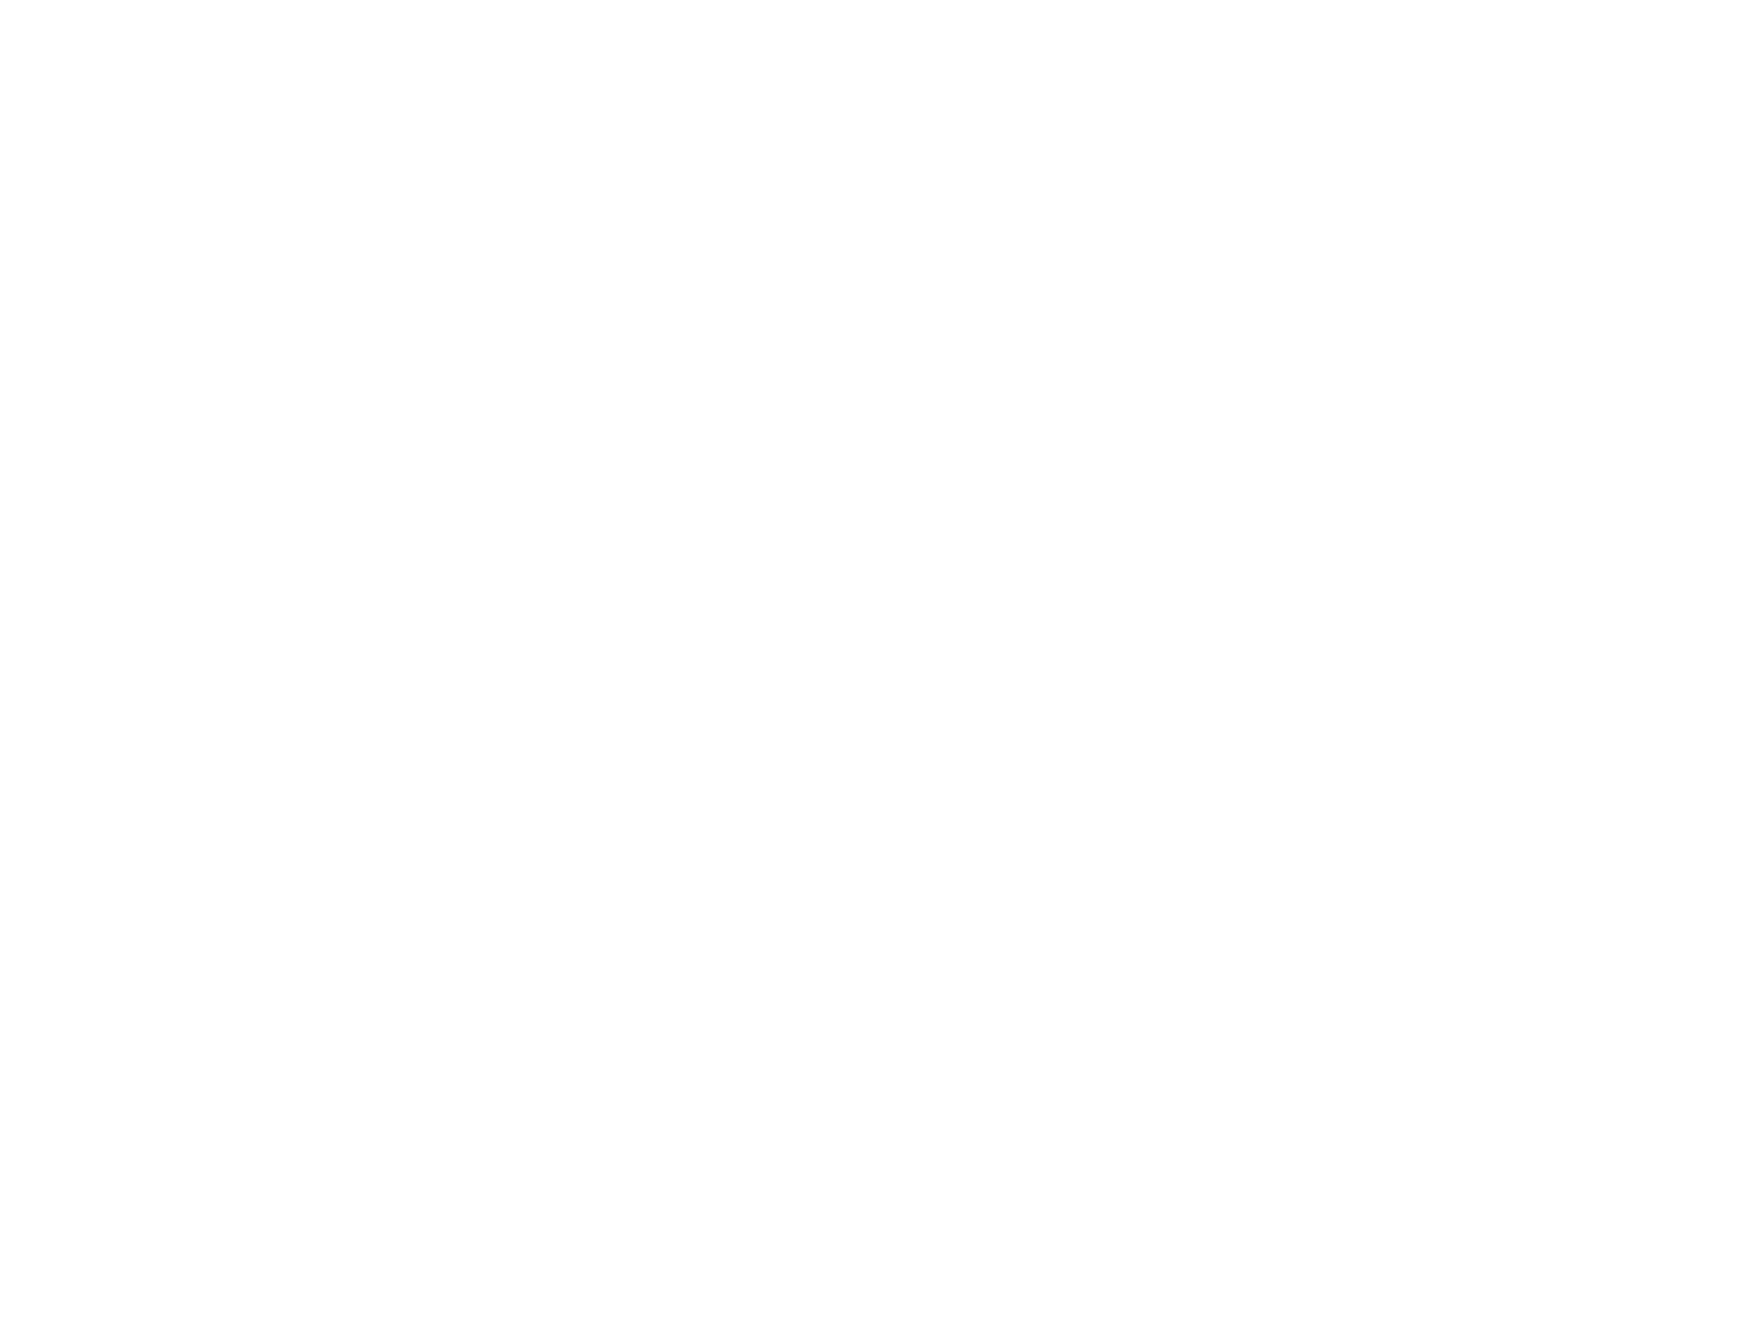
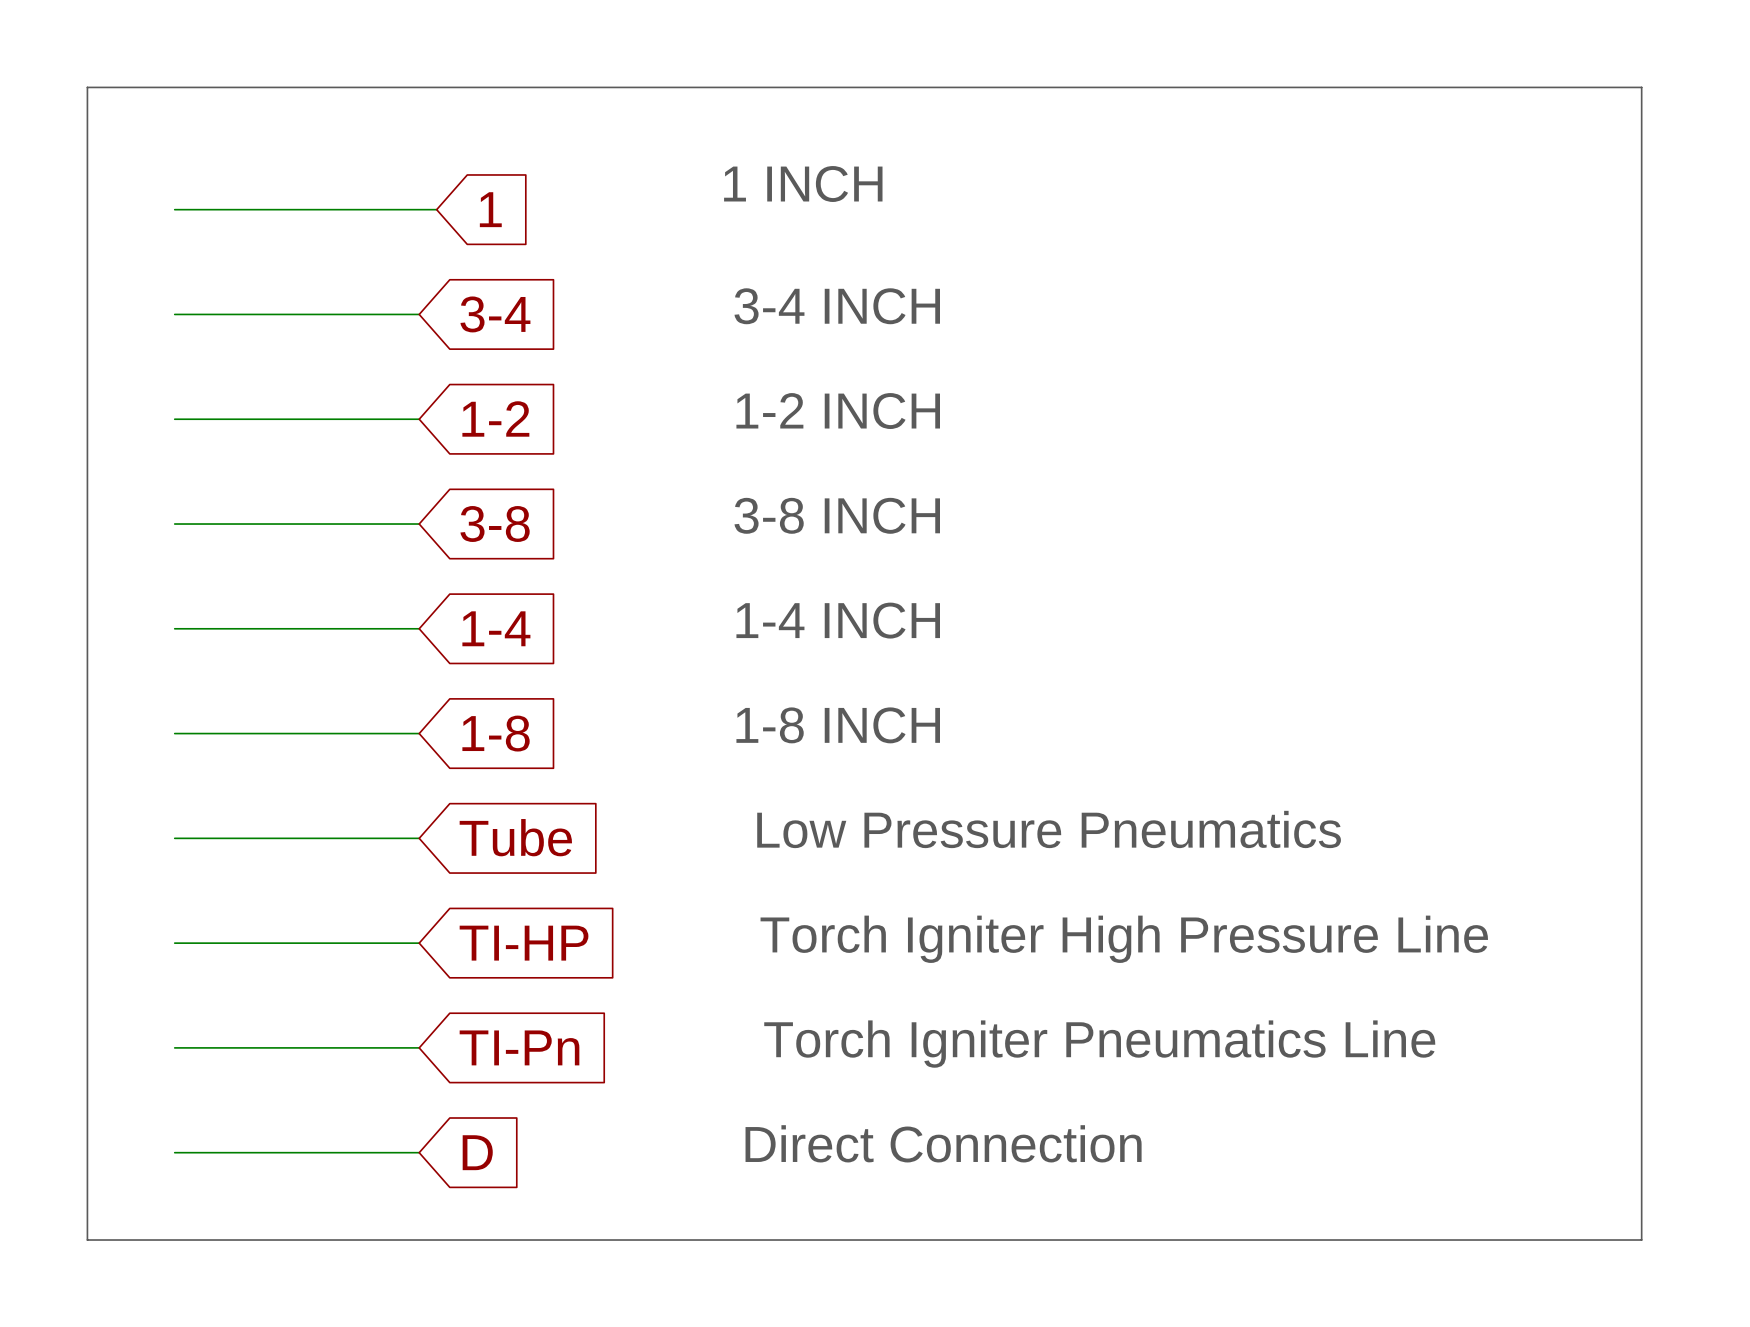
line: none -> (87, 87) (1641, 87) (1641, 1240) (87, 1240) (87, 87)
text: none -> 1 INCH (803, 184)
wire: none -> (174, 209) (436, 209)
global label: none -> 1 (490, 209)
text: none -> 3-4 INCH (837, 306)
global label: none -> 3-4 (495, 314)
wire: none -> (174, 314) (419, 314)
text: none -> 1-2 INCH (838, 411)
wire: none -> (174, 419) (419, 419)
global label: none -> 1-2 (495, 418)
text: none -> 3-8 INCH (837, 515)
wire: none -> (174, 524) (419, 524)
global label: none -> 3-8 (495, 524)
text: none -> 1-4 INCH (838, 620)
global label: none -> 1-4 (496, 628)
wire: none -> (174, 628) (419, 628)
text: none -> 1-8 INCH (838, 725)
wire: none -> (174, 733) (419, 733)
global label: none -> 1-8 (496, 733)
text: none -> Low Pressure Pneumatics (1049, 829)
wire: none -> (174, 838) (419, 838)
global label: none -> Tube (515, 837)
text: none -> Torch Igniter High Pressure Line (1124, 939)
wire: none -> (174, 943) (419, 943)
global label: none -> TI-HP (524, 943)
text: none -> Torch Igniter Pneumatics Line (1099, 1044)
wire: none -> (174, 1047) (419, 1047)
global label: none -> TI-Pn (519, 1047)
text: none -> Direct Connection (943, 1143)
wire: none -> (174, 1152) (419, 1152)
global label: none -> D (477, 1152)

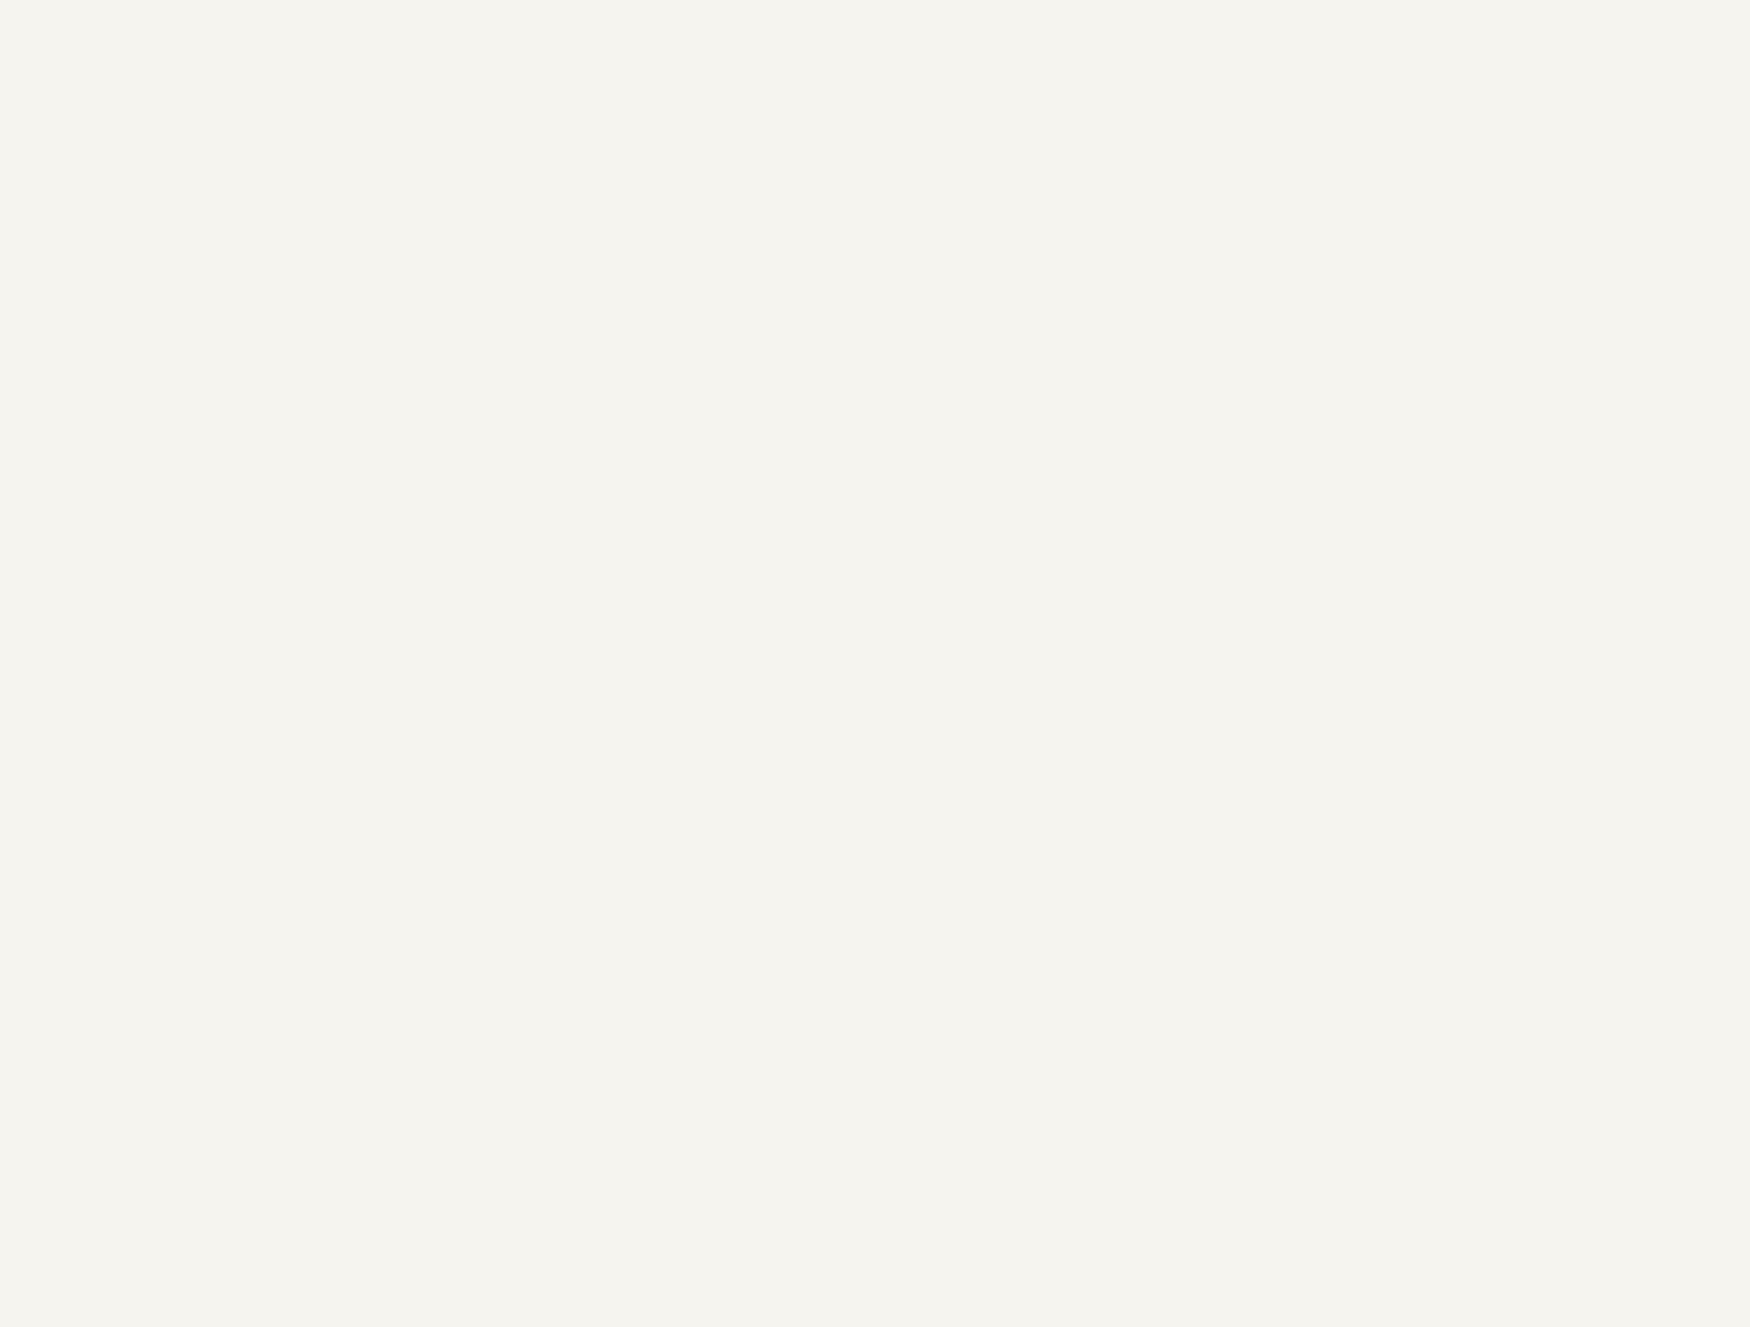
line: (87, 87) (1641, 87) (1641, 1240) (87, 1240) (87, 87) -> none
text: 1 INCH (803, 184) -> none
wire: (174, 209) (436, 209) -> none
global label: 1 (490, 209) -> none
text: 3-4 INCH (837, 306) -> none
wire: (174, 314) (419, 314) -> none
global label: 3-4 (495, 314) -> none
text: 1-2 INCH (838, 411) -> none
global label: 1-2 (495, 418) -> none
wire: (174, 419) (419, 419) -> none
text: 3-8 INCH (837, 515) -> none
wire: (174, 524) (419, 524) -> none
global label: 3-8 (495, 524) -> none
text: 1-4 INCH (838, 620) -> none
wire: (174, 628) (419, 628) -> none
global label: 1-4 (496, 628) -> none
text: 1-8 INCH (838, 725) -> none
wire: (174, 733) (419, 733) -> none
global label: 1-8 (496, 733) -> none
text: Low Pressure Pneumatics (1049, 829) -> none
global label: Tube (515, 837) -> none
wire: (174, 838) (419, 838) -> none
text: Torch Igniter High Pressure Line (1124, 939) -> none
wire: (174, 943) (419, 943) -> none
global label: TI-HP (524, 943) -> none
text: Torch Igniter Pneumatics Line (1099, 1044) -> none
wire: (174, 1047) (419, 1047) -> none
global label: TI-Pn (519, 1047) -> none
text: Direct Connection (943, 1143) -> none
wire: (174, 1152) (419, 1152) -> none
global label: D (477, 1152) -> none

